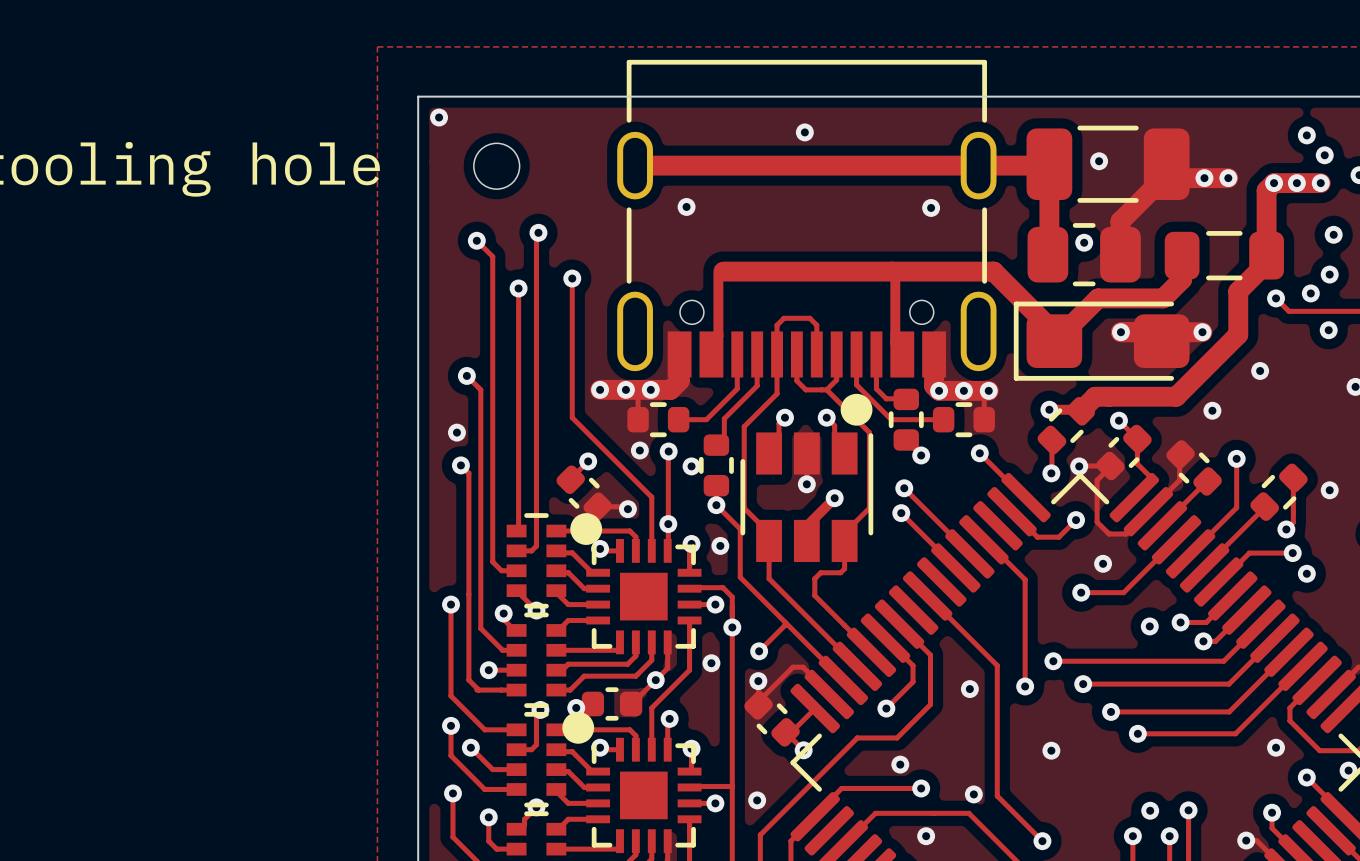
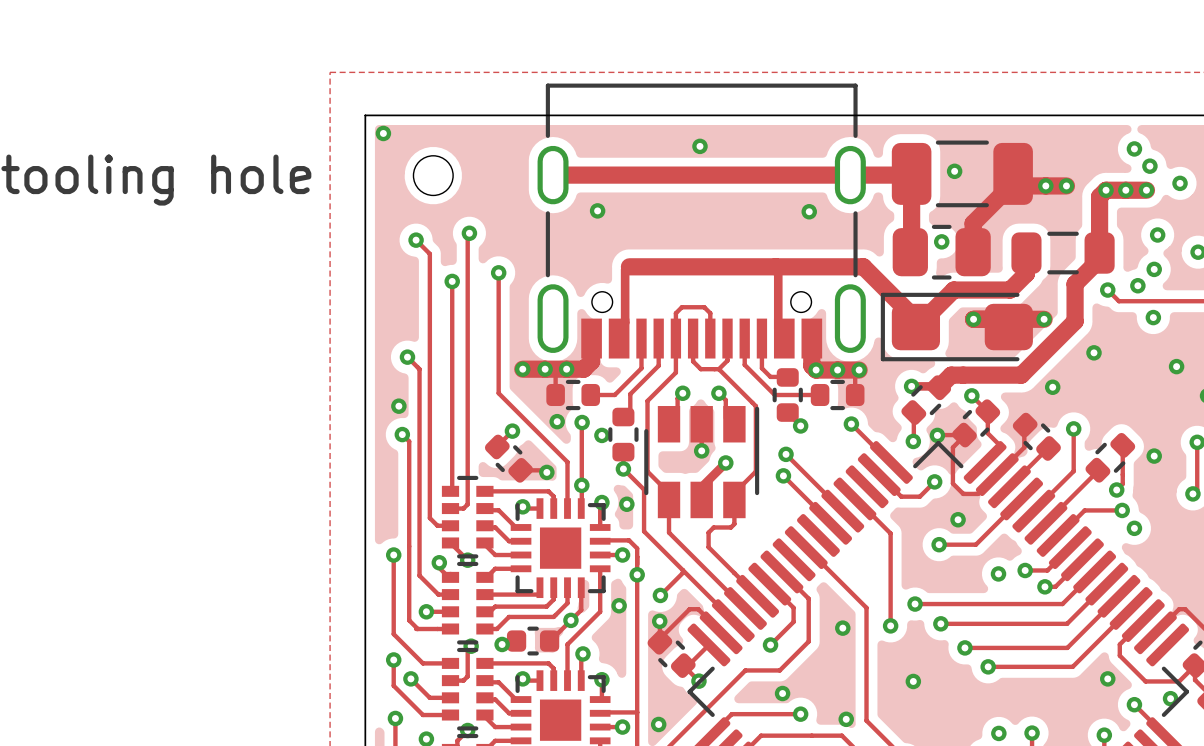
drawing: [840, 393, 873, 426] -> none
drawing: [570, 513, 603, 545] -> none
drawing: [562, 711, 595, 744] -> none

